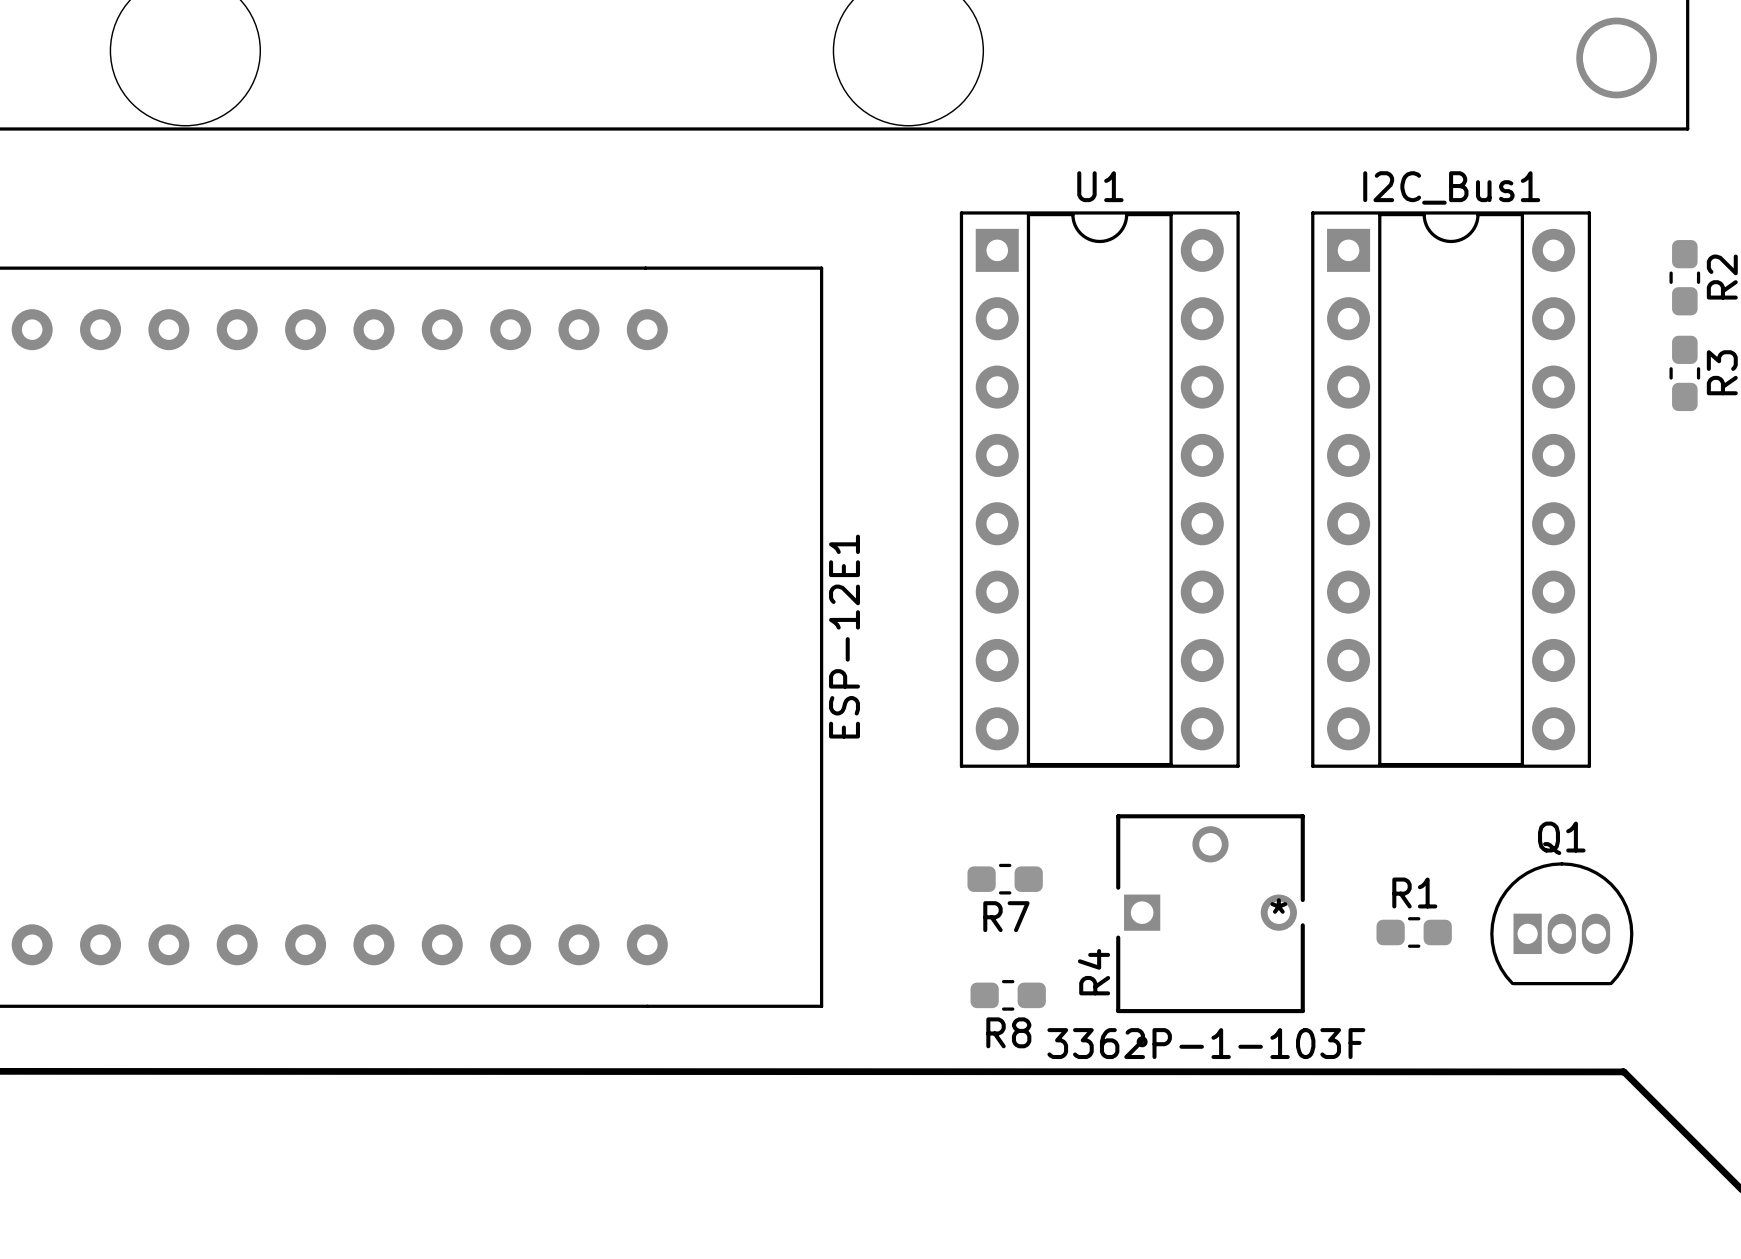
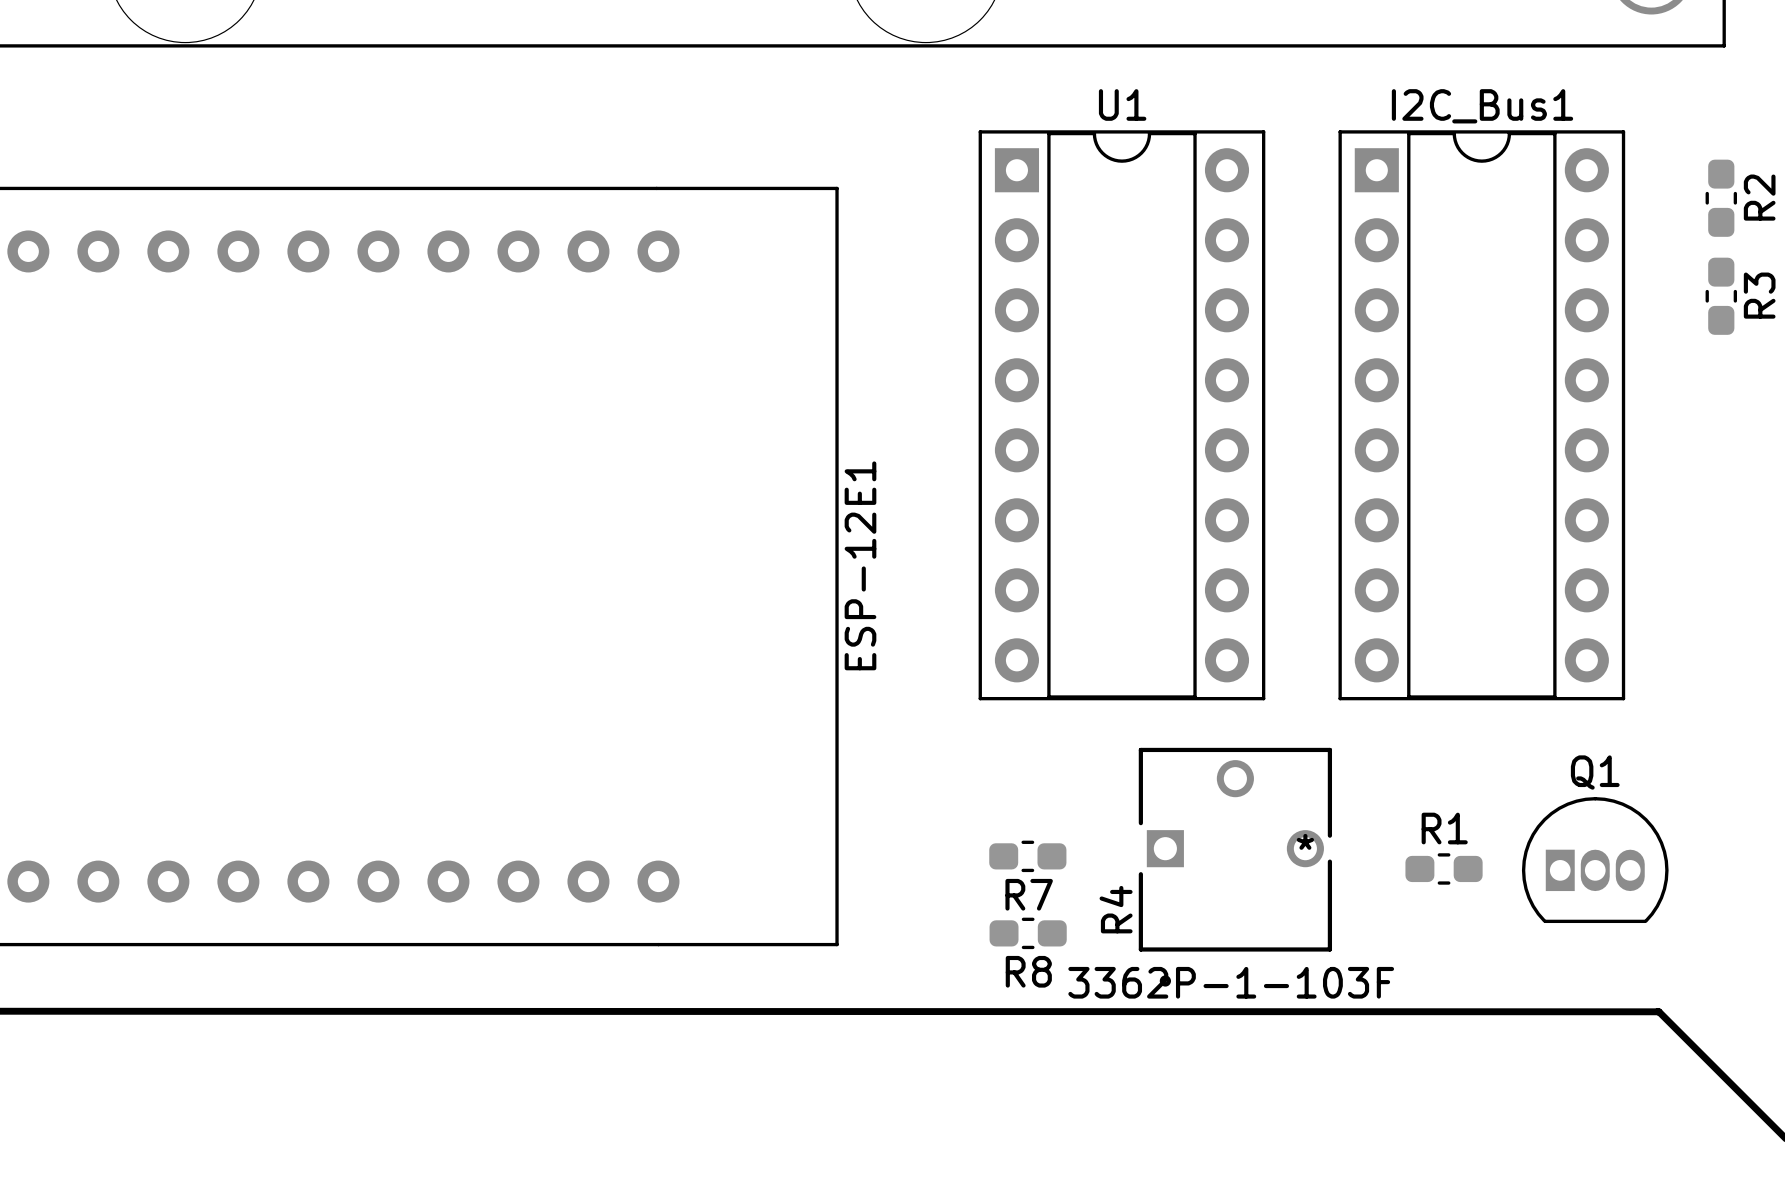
R7 position: (1005, 879) -> (1027, 856)

